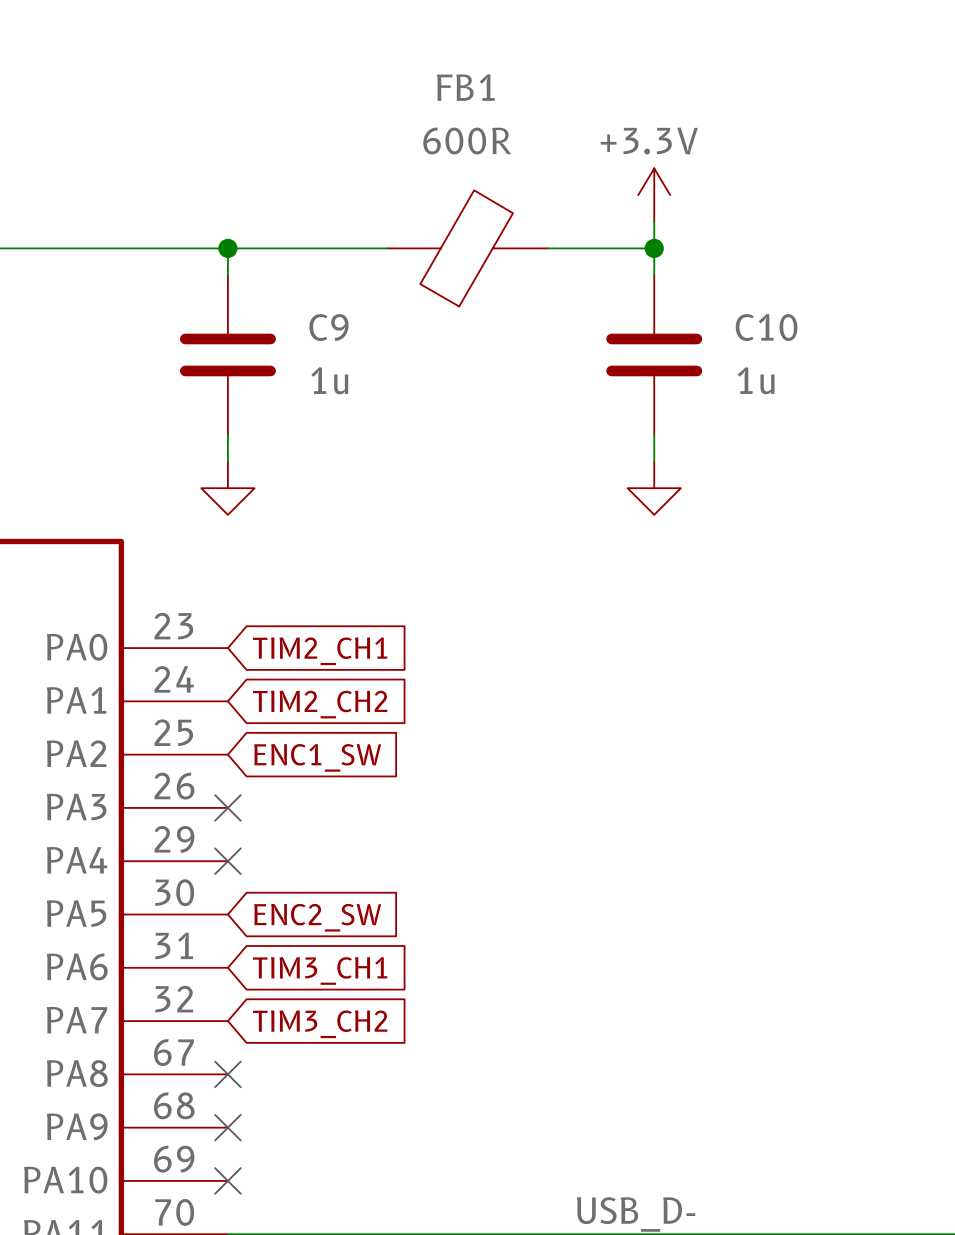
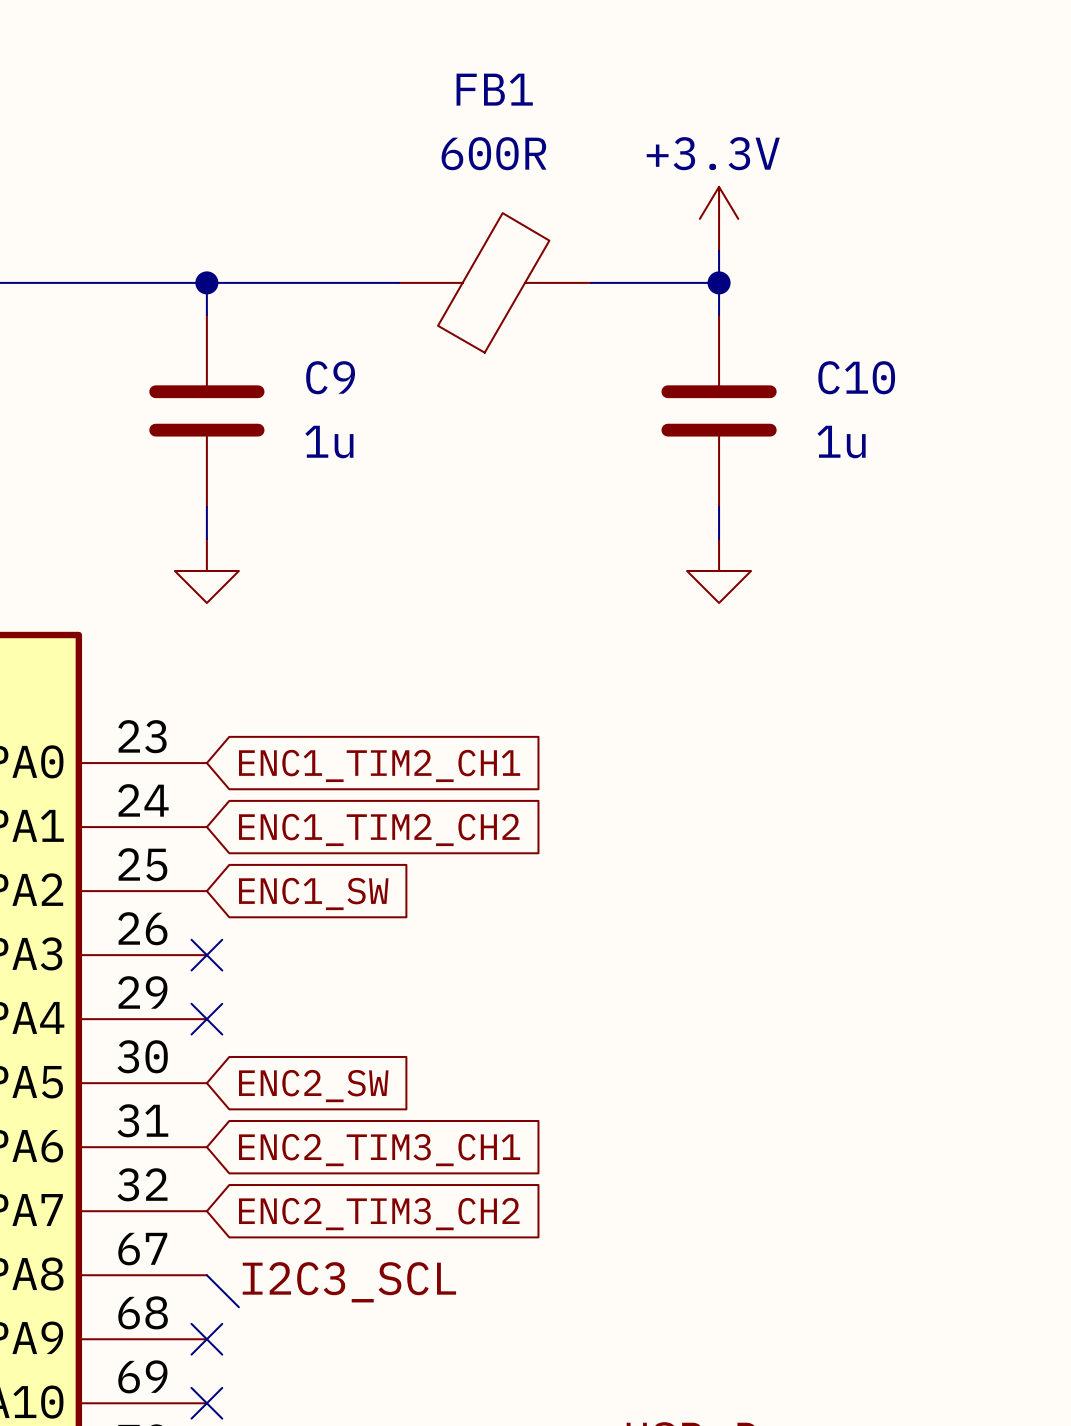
global label: TIM2_CH1 (320, 651) -> ENC1_TIM2_CH1 (379, 765)
global label: TIM2_CH2 (320, 704) -> ENC1_TIM2_CH2 (379, 829)
global label: TIM3_CH1 (320, 970) -> ENC2_TIM3_CH1 (379, 1150)
global label: TIM3_CH2 (320, 1024) -> ENC2_TIM3_CH2 (379, 1214)
wire: none -> (206, 1275) (238, 1307)
no-connect mark: (227, 1074) -> none
label: none -> I2C3_SCL (349, 1282)

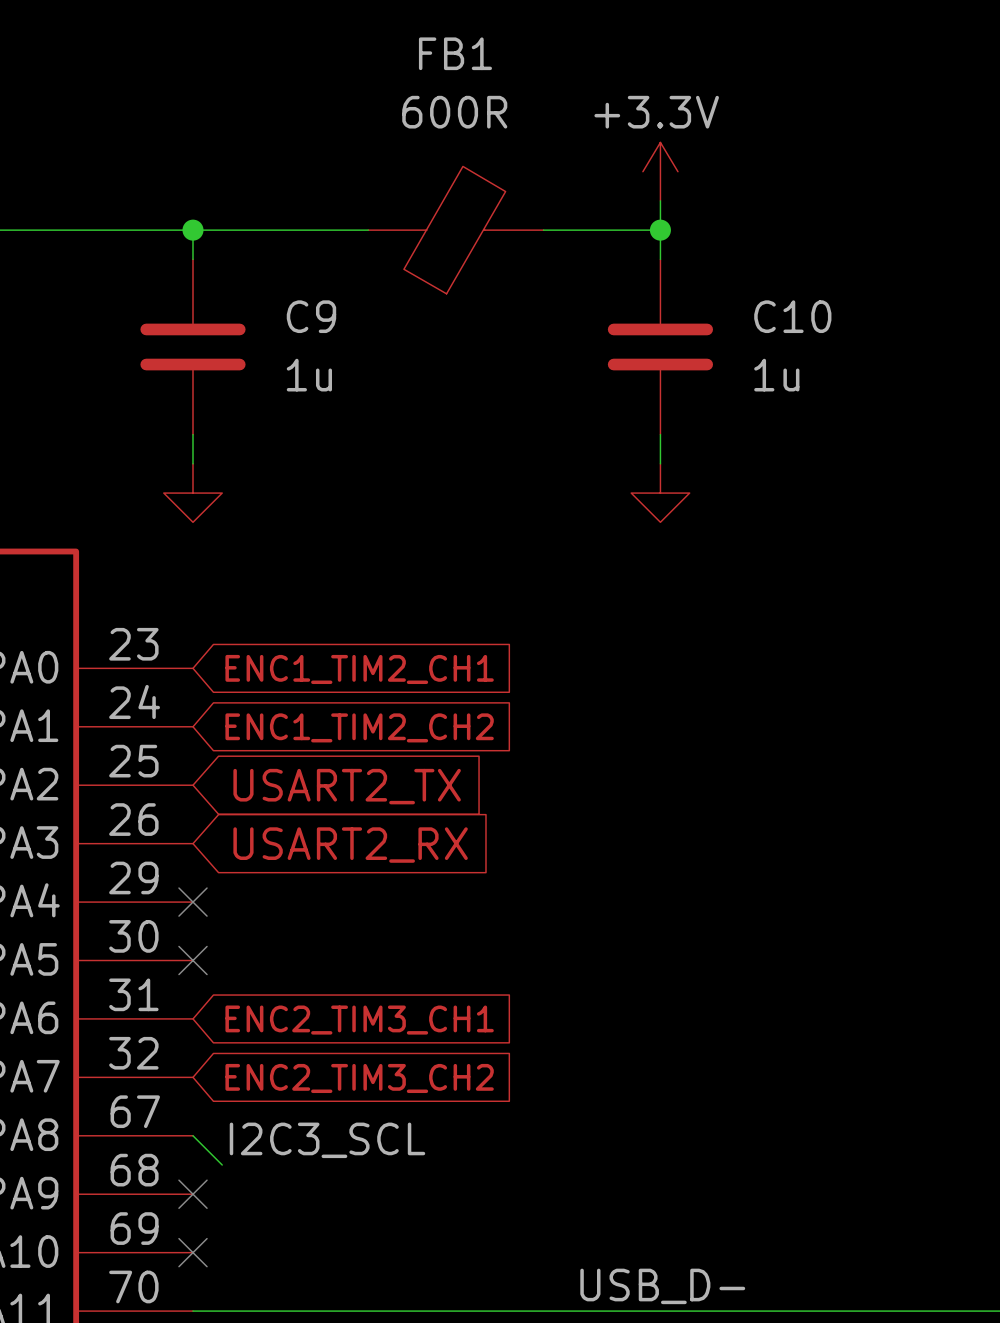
global label: ENC1_SW (313, 893) -> USART2_TX (347, 786)
no-connect mark position: (206, 955) -> (193, 960)
global label: none -> USART2_RX (350, 845)
global label: ENC2_SW (313, 1086) -> none

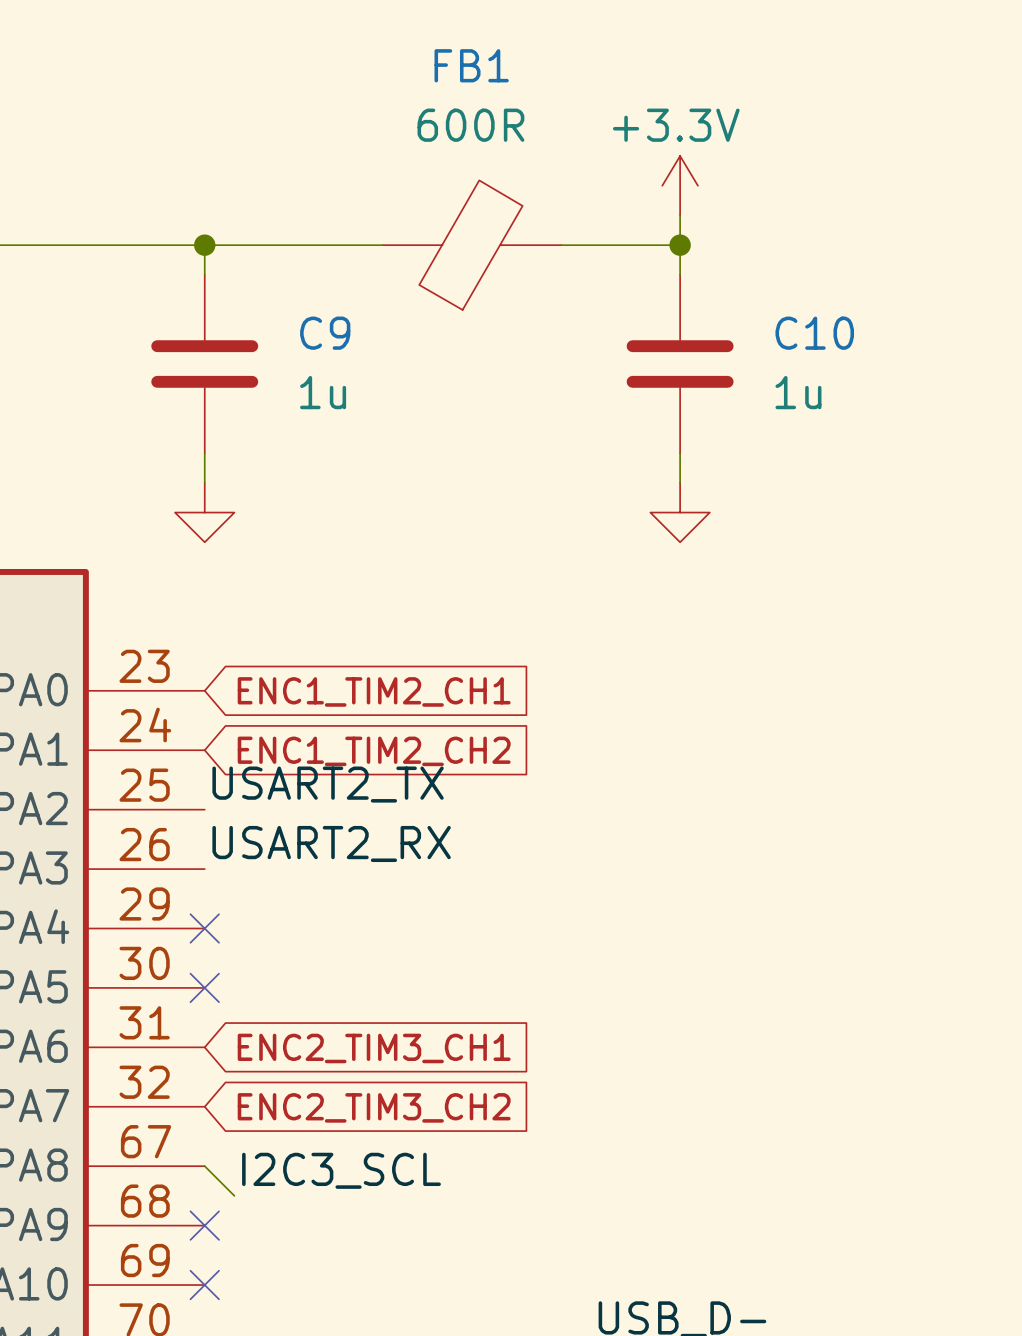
label: none -> USART2_TX (328, 784)
global label: USART2_TX (347, 786) -> none
label: none -> USART2_RX (331, 843)
global label: USART2_RX (350, 845) -> none

